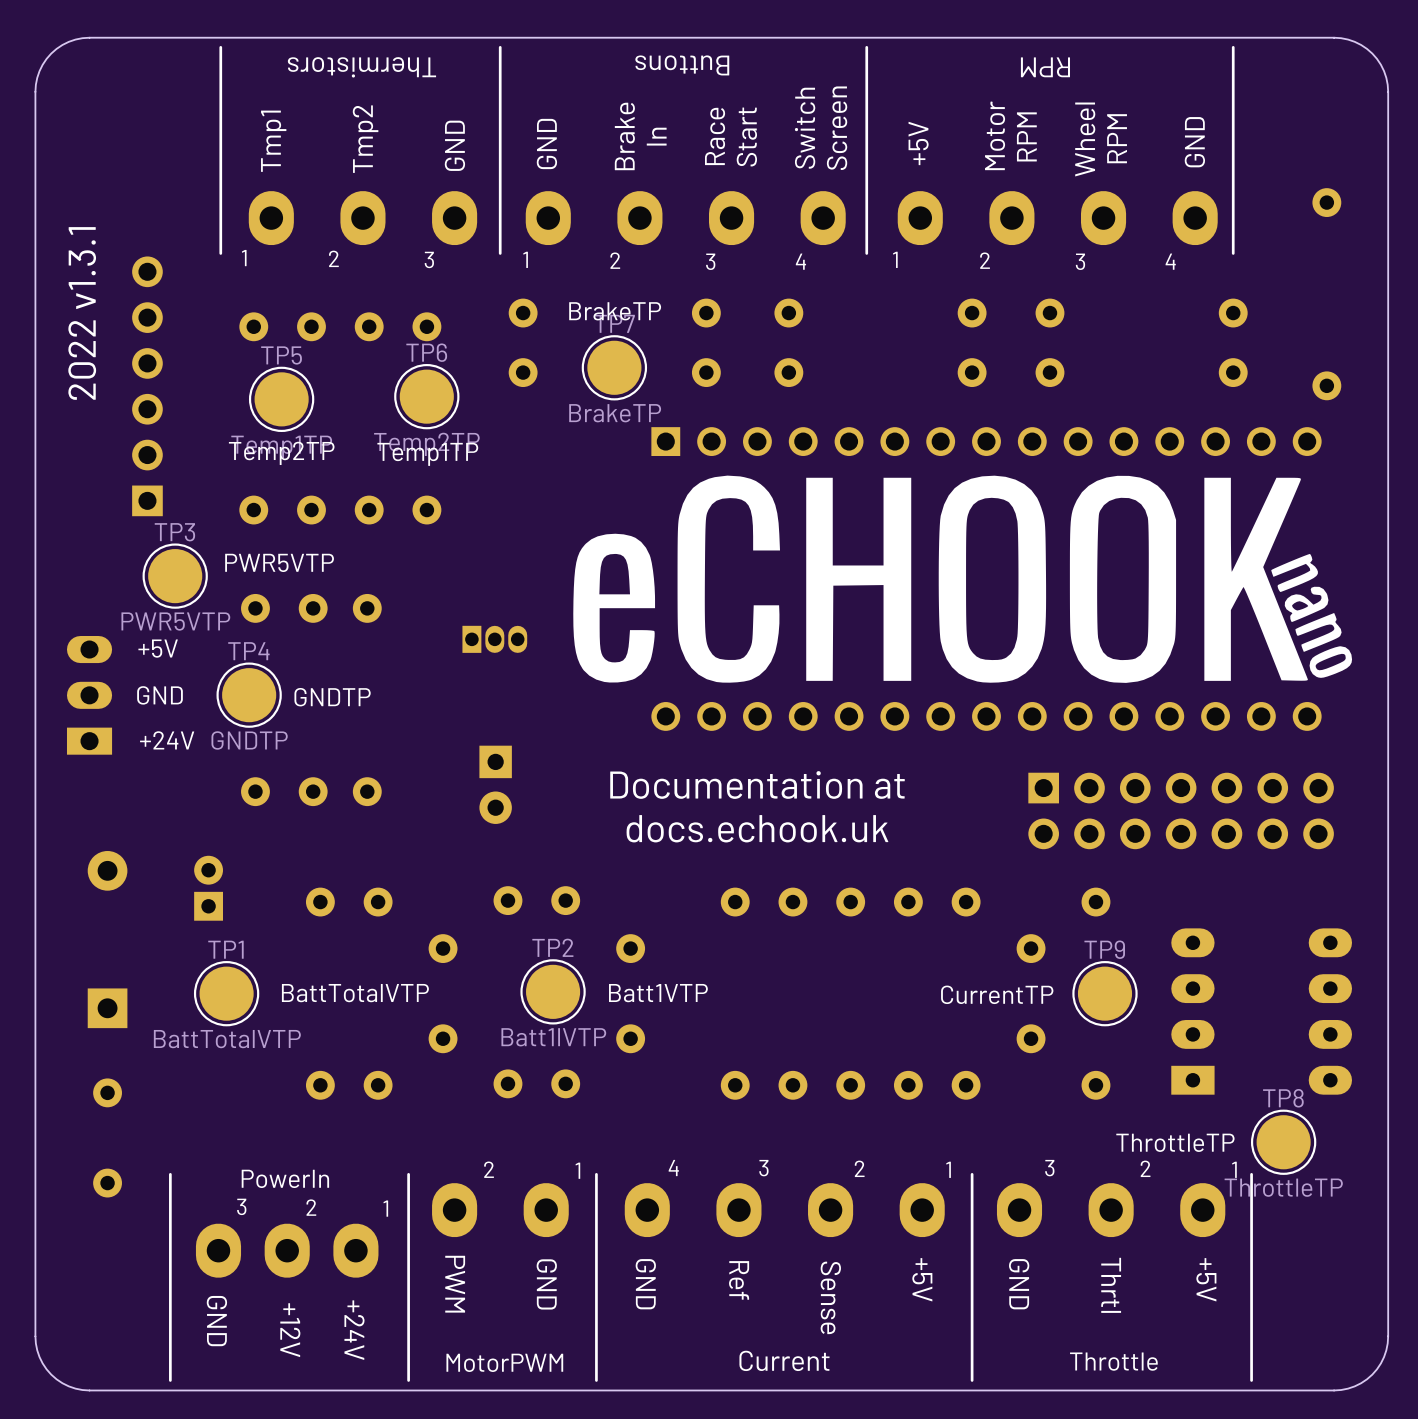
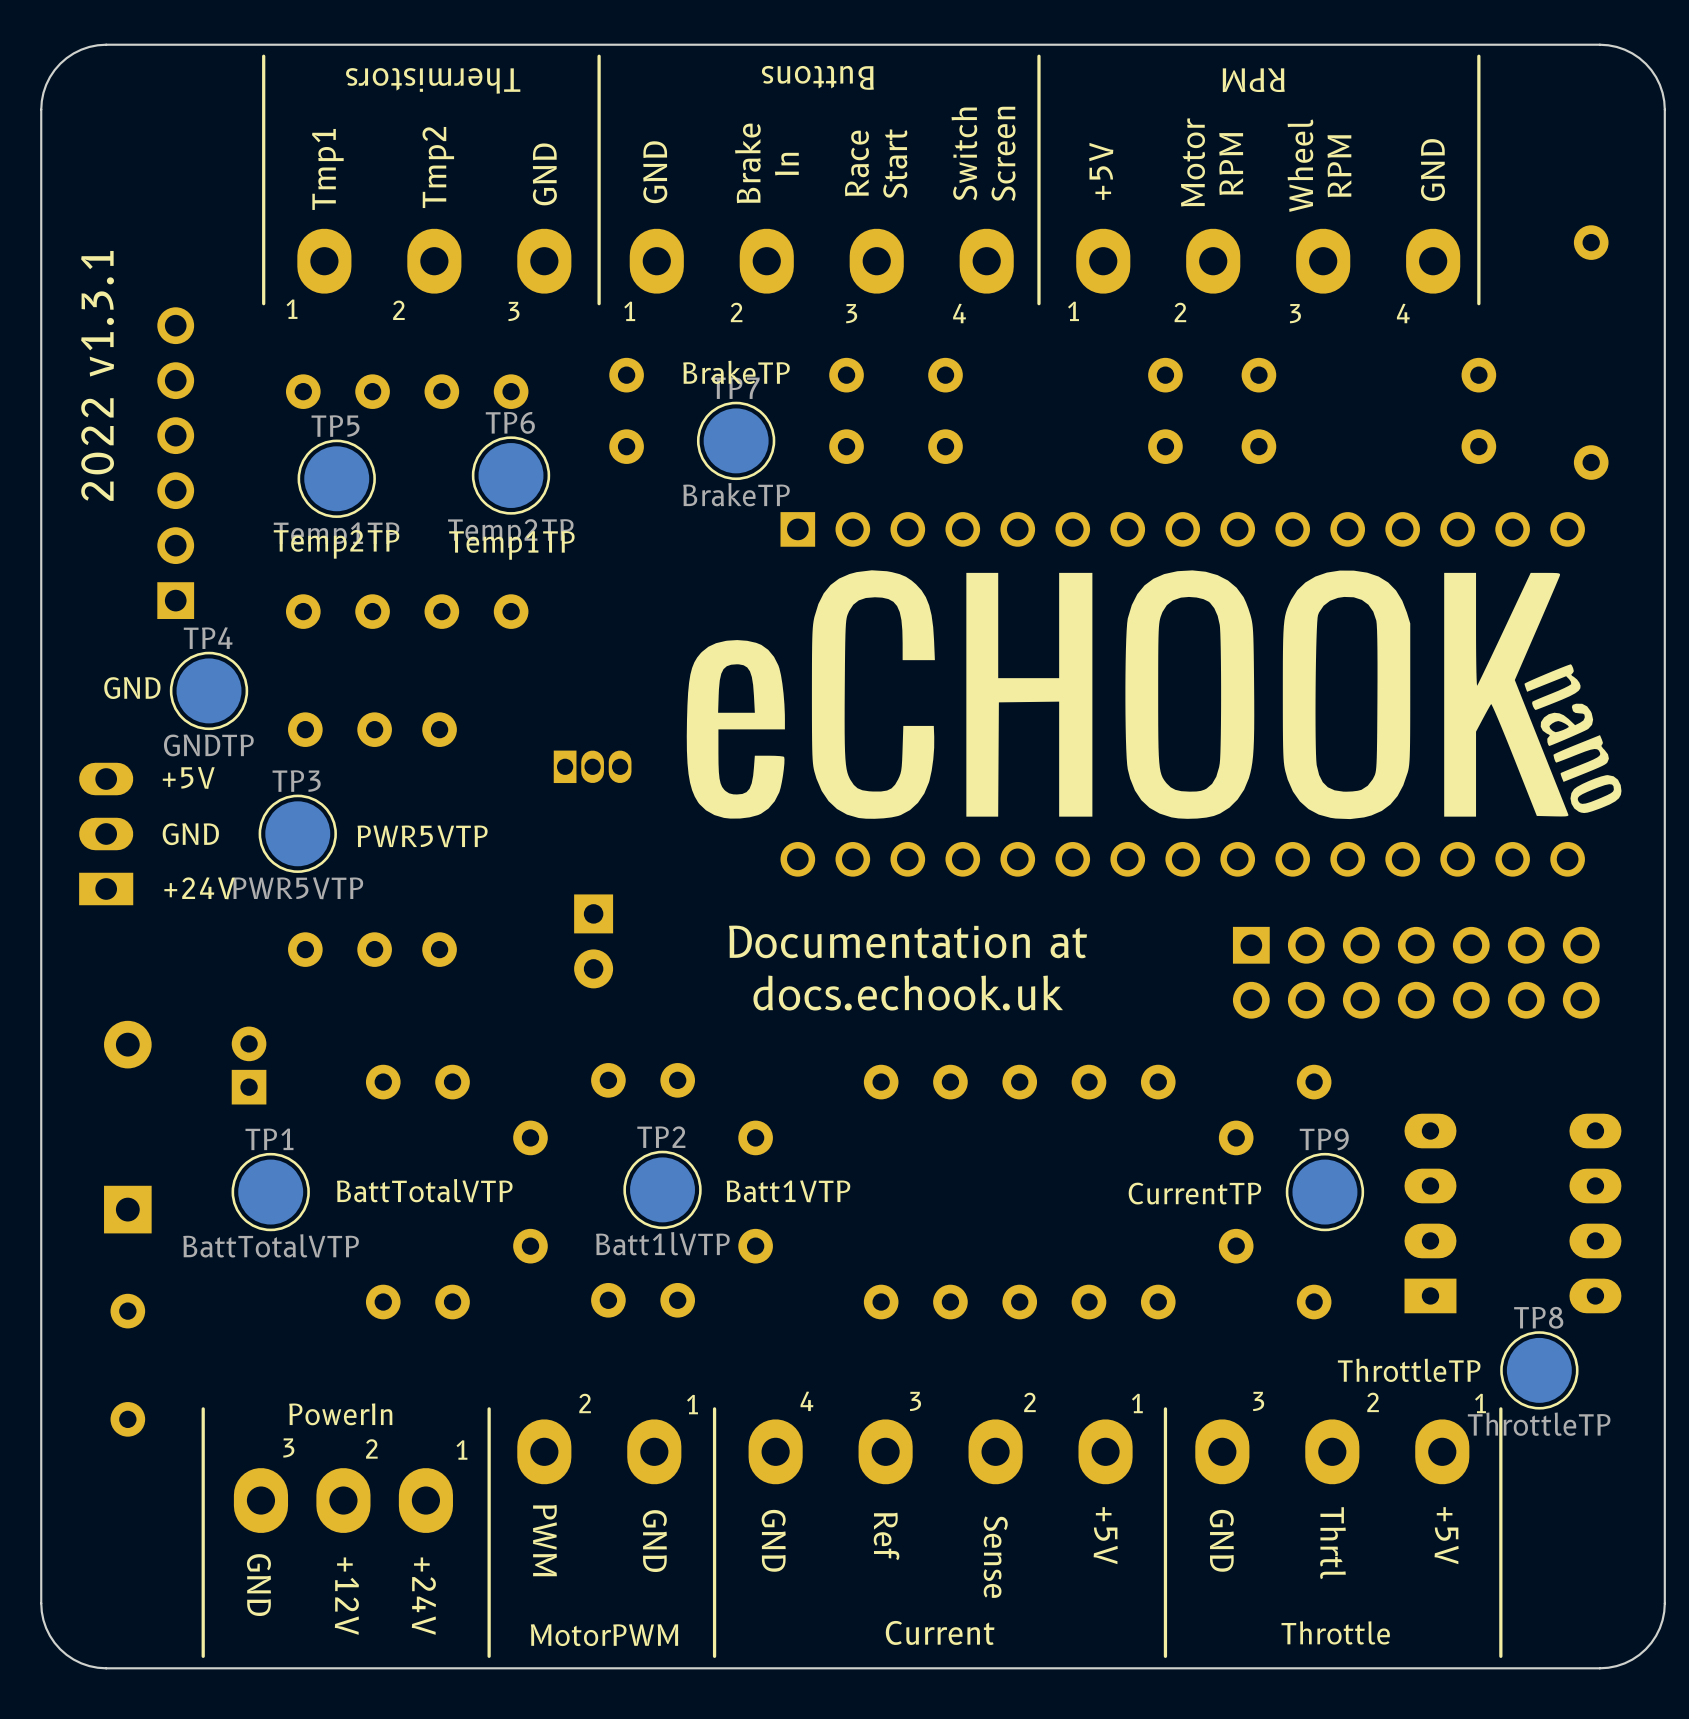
TP3 name: TP3 (174, 532) -> TP4 (208, 638)
text position: PWR5VTP (279, 562) -> PWR5VTP (422, 836)
text: none -> GND (132, 688)
TP3 value: PWR5VTP (175, 621) -> GNDTP (208, 745)
TP4 name: TP4 (248, 651) -> TP3 (296, 781)
text: GNDTP (332, 697) -> none
TP4 value: GNDTP (249, 740) -> PWR5VTP (298, 888)

